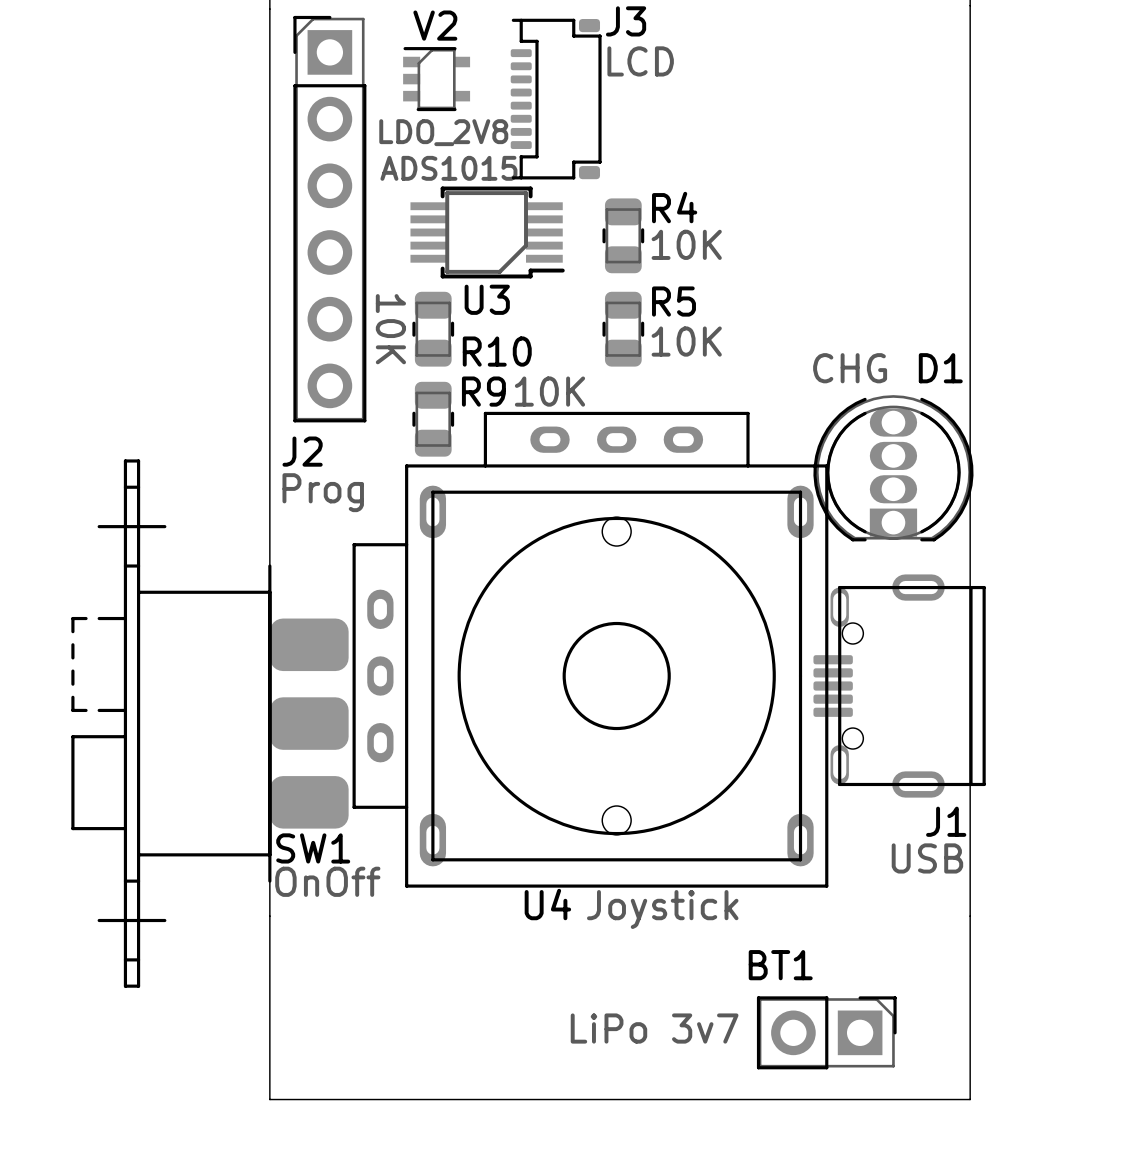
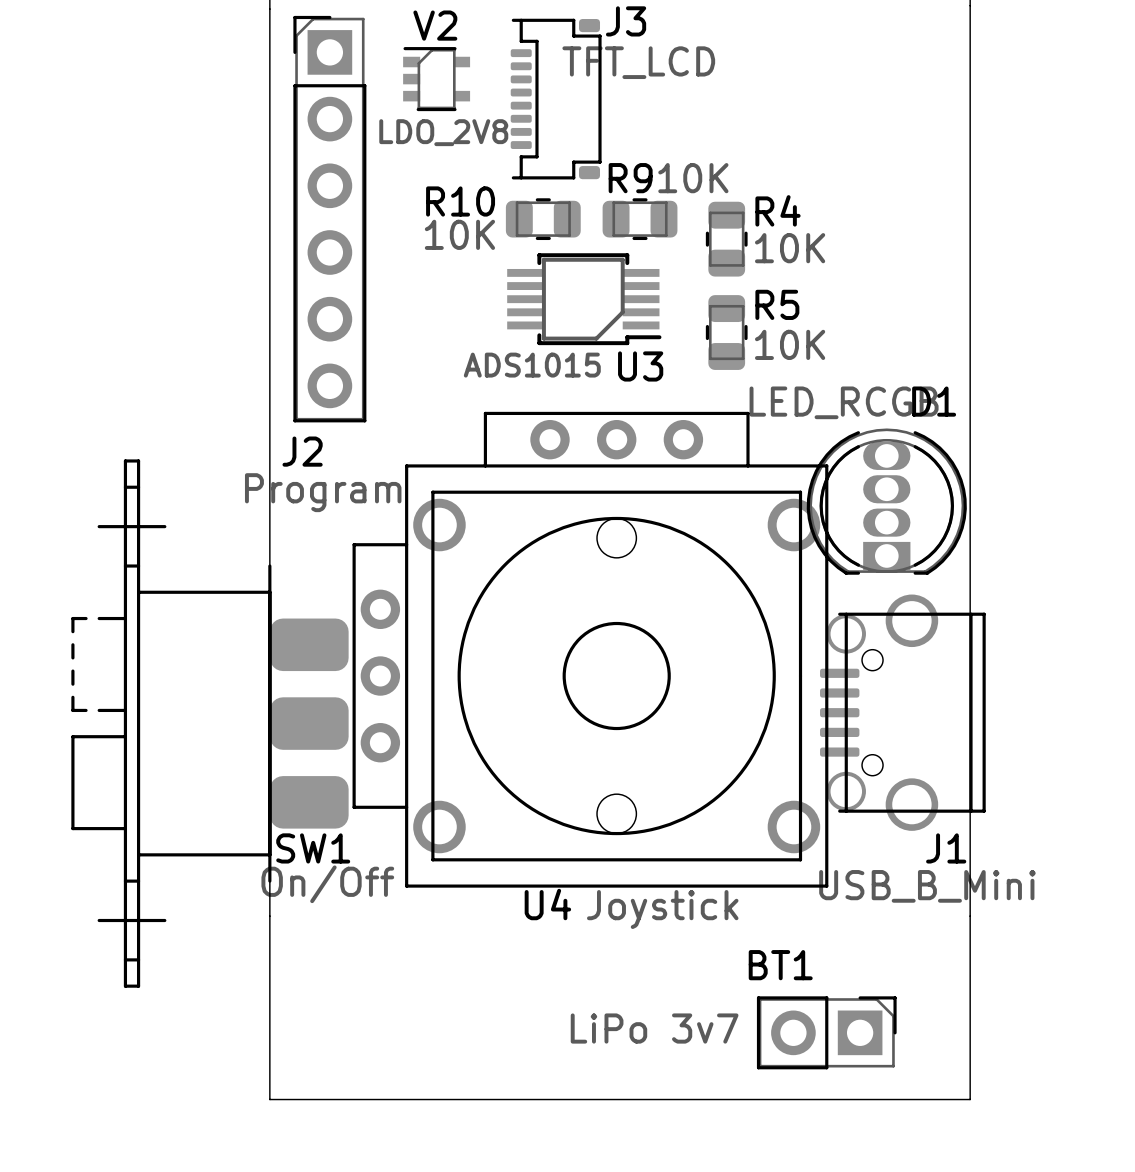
J3 value: LCD (640, 61) -> TFT_LCD (638, 62)
U3 value position: ADS1015 (448, 168) -> ADS1015 (532, 365)
U3 position: (487, 232) -> (584, 299)
R4 position: (623, 235) -> (726, 239)
U3 name position: U3 (487, 299) -> U3 (640, 366)
R10 rotation: 0° (433, 329) -> 90° clockwise (543, 219)
R10 position: (433, 329) -> (543, 219)
R5 position: (623, 329) -> (726, 332)
R10 name position: R10 (497, 351) -> R10 (460, 201)
D1 value: CHG (850, 368) -> LED_RCGB (844, 402)
R9 name position: R9 (483, 391) -> R9 (630, 178)
R9 value position: 10K (549, 391) -> 10K (693, 178)
U4 footprint: [352, 411, 829, 888] -> [352, 411, 829, 888]
R9 rotation: 0° (433, 419) -> 90° clockwise (640, 219)
R9 position: (433, 419) -> (640, 219)
D1 position: (893, 468) -> (886, 501)
J2 value: Prog (323, 492) -> Program (323, 492)
J1 footprint: [813, 574, 986, 798] -> [820, 594, 986, 831]
J1 value: USB (927, 858) -> USB_B_Mini (927, 886)
SW1 value: OnOff (327, 881) -> On/Off (327, 884)

